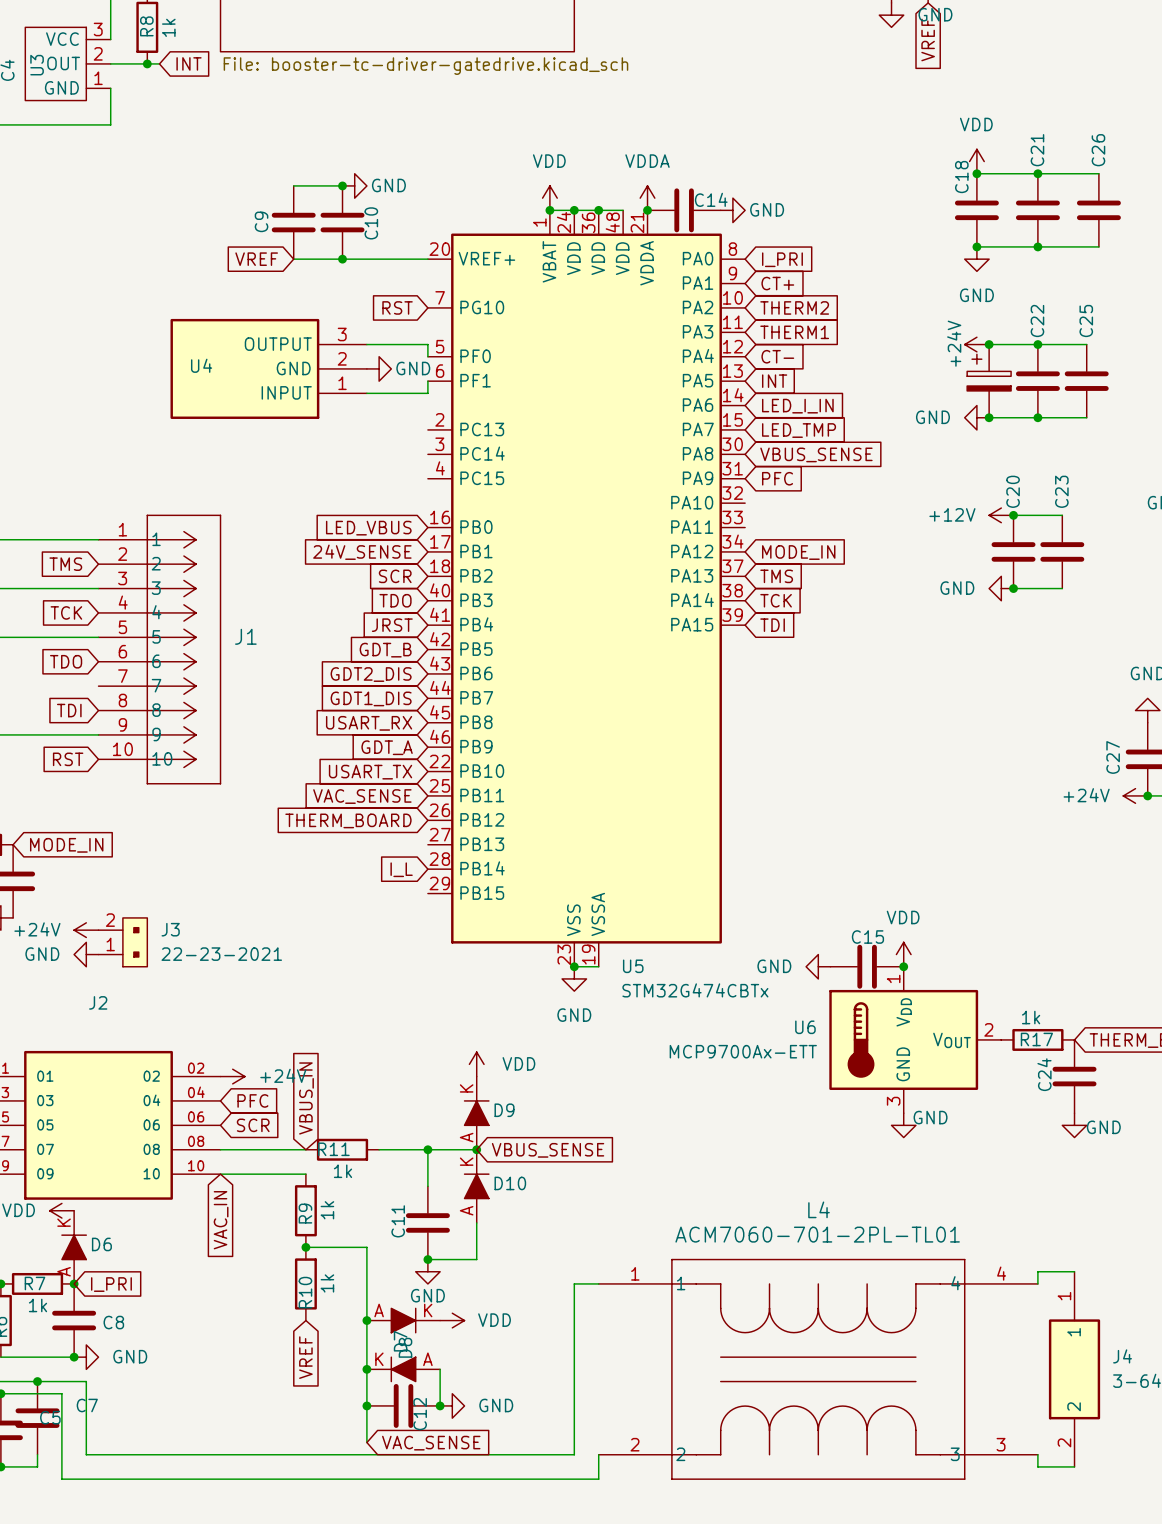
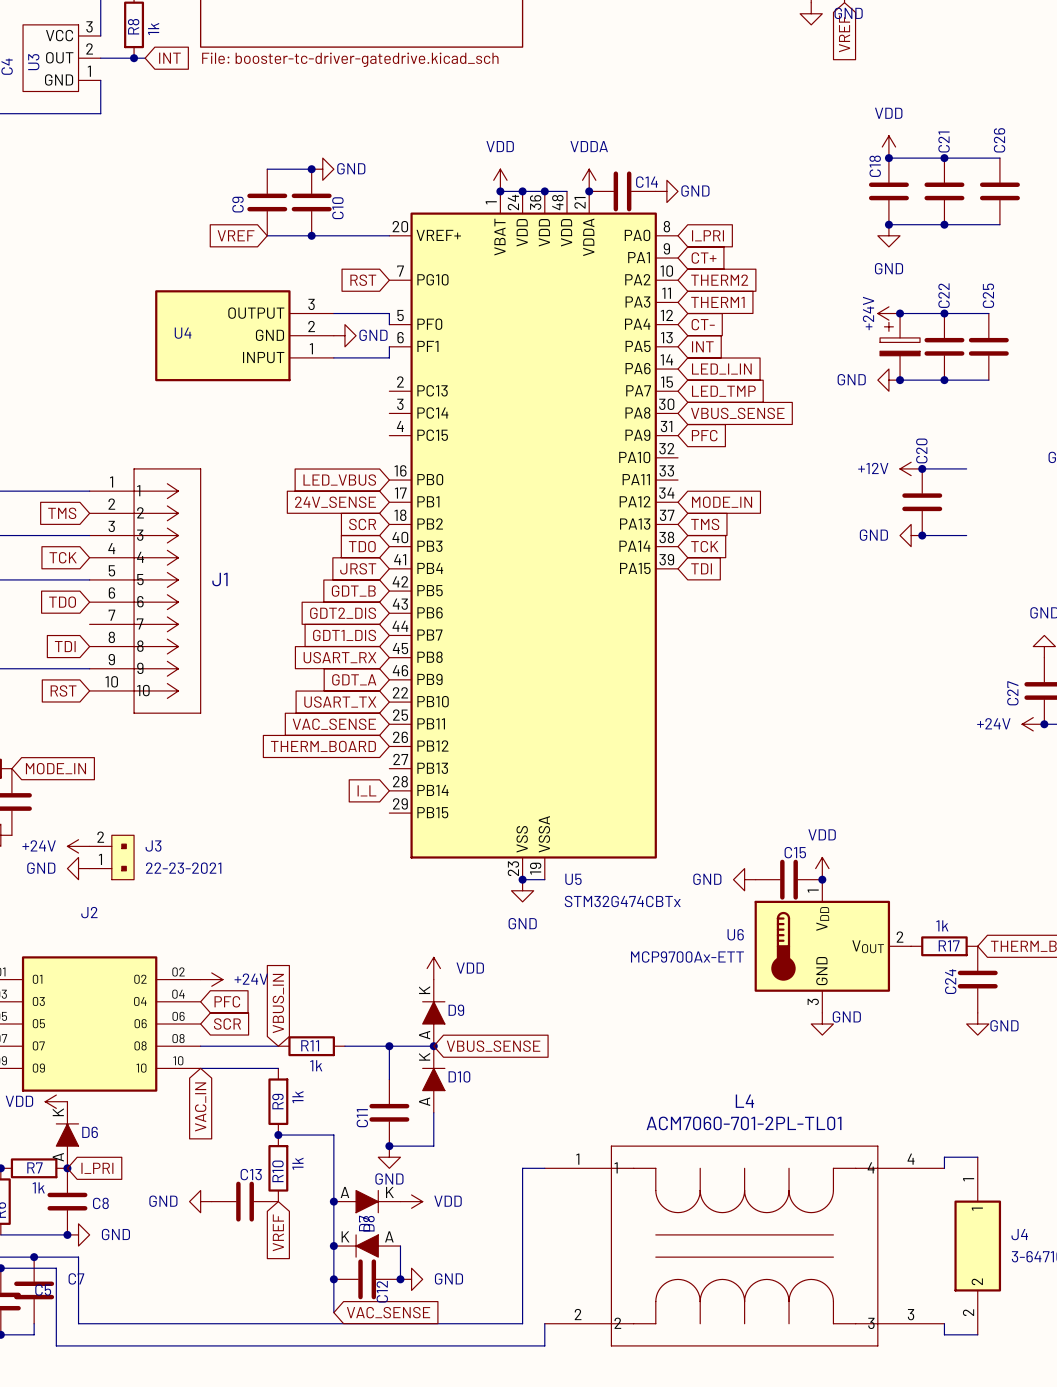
C23: (1062, 551) -> none
power symbol: none -> GND (200, 1201)
C13: none -> (245, 1201)

